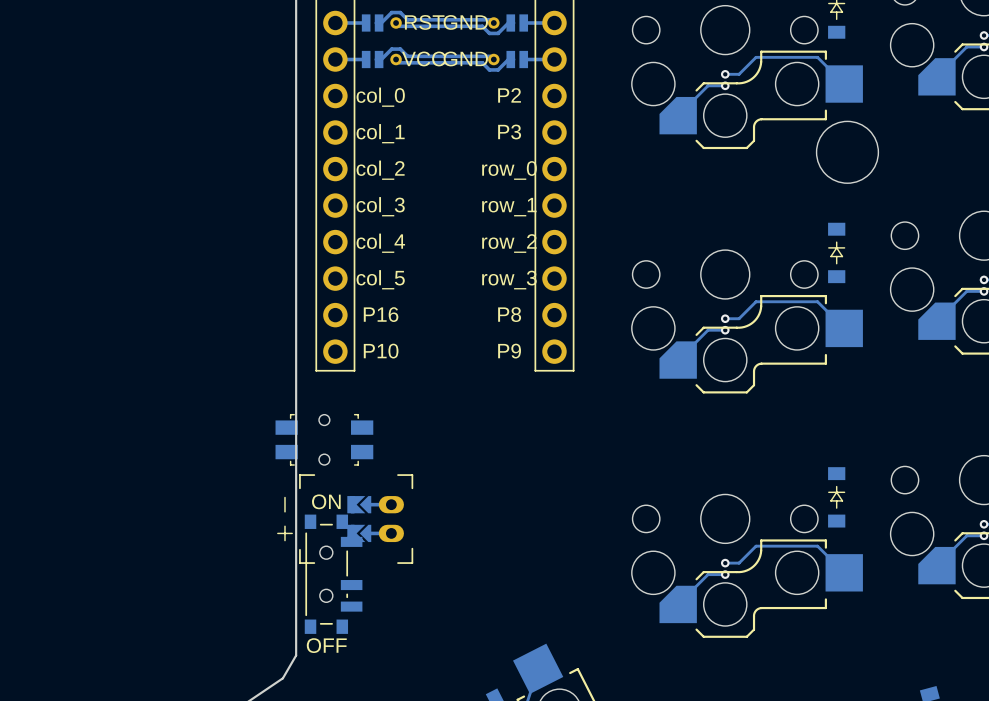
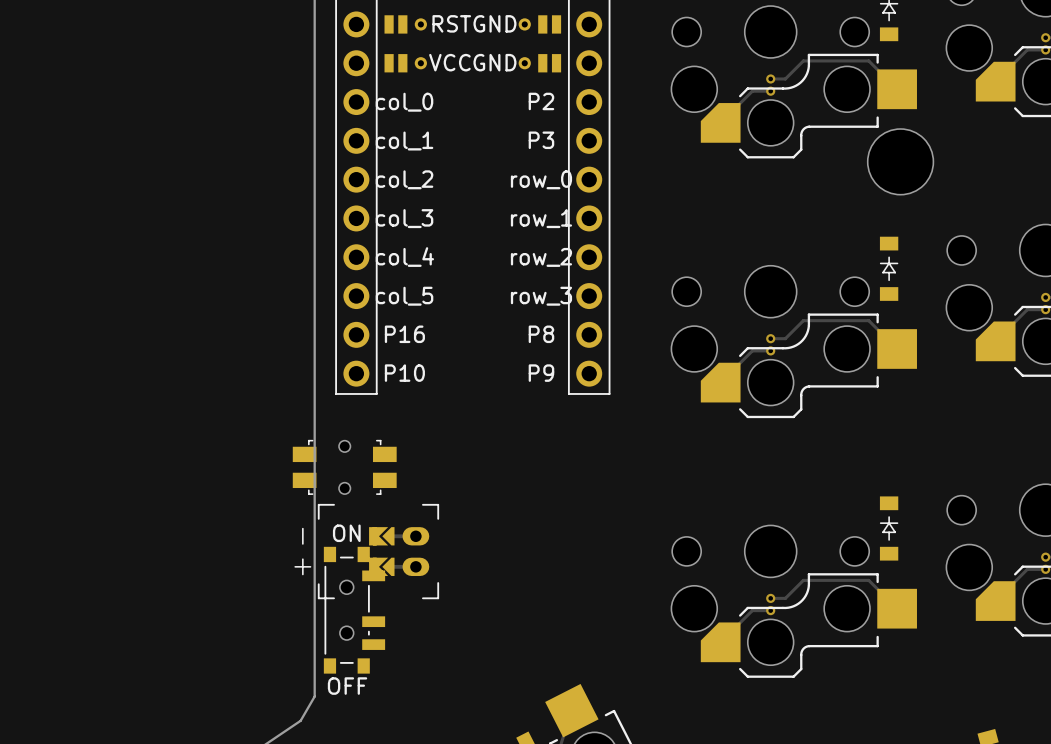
track: (490, 19) (407, 19) (400, 12) (391, 12) (381, 22) (376, 22) -> none
track: (365, 22) (335, 22) -> none
track: (513, 22) (508, 22) (498, 33) (489, 33) (482, 26) (399, 26) -> none
track: (554, 22) (524, 22) -> none
track: (490, 56) (407, 56) (400, 49) (391, 49) (381, 59) (376, 59) -> none
track: (365, 59) (335, 59) -> none
track: (513, 59) (508, 59) (498, 69) (489, 69) (482, 62) (399, 62) -> none
track: (554, 59) (524, 59) -> none

